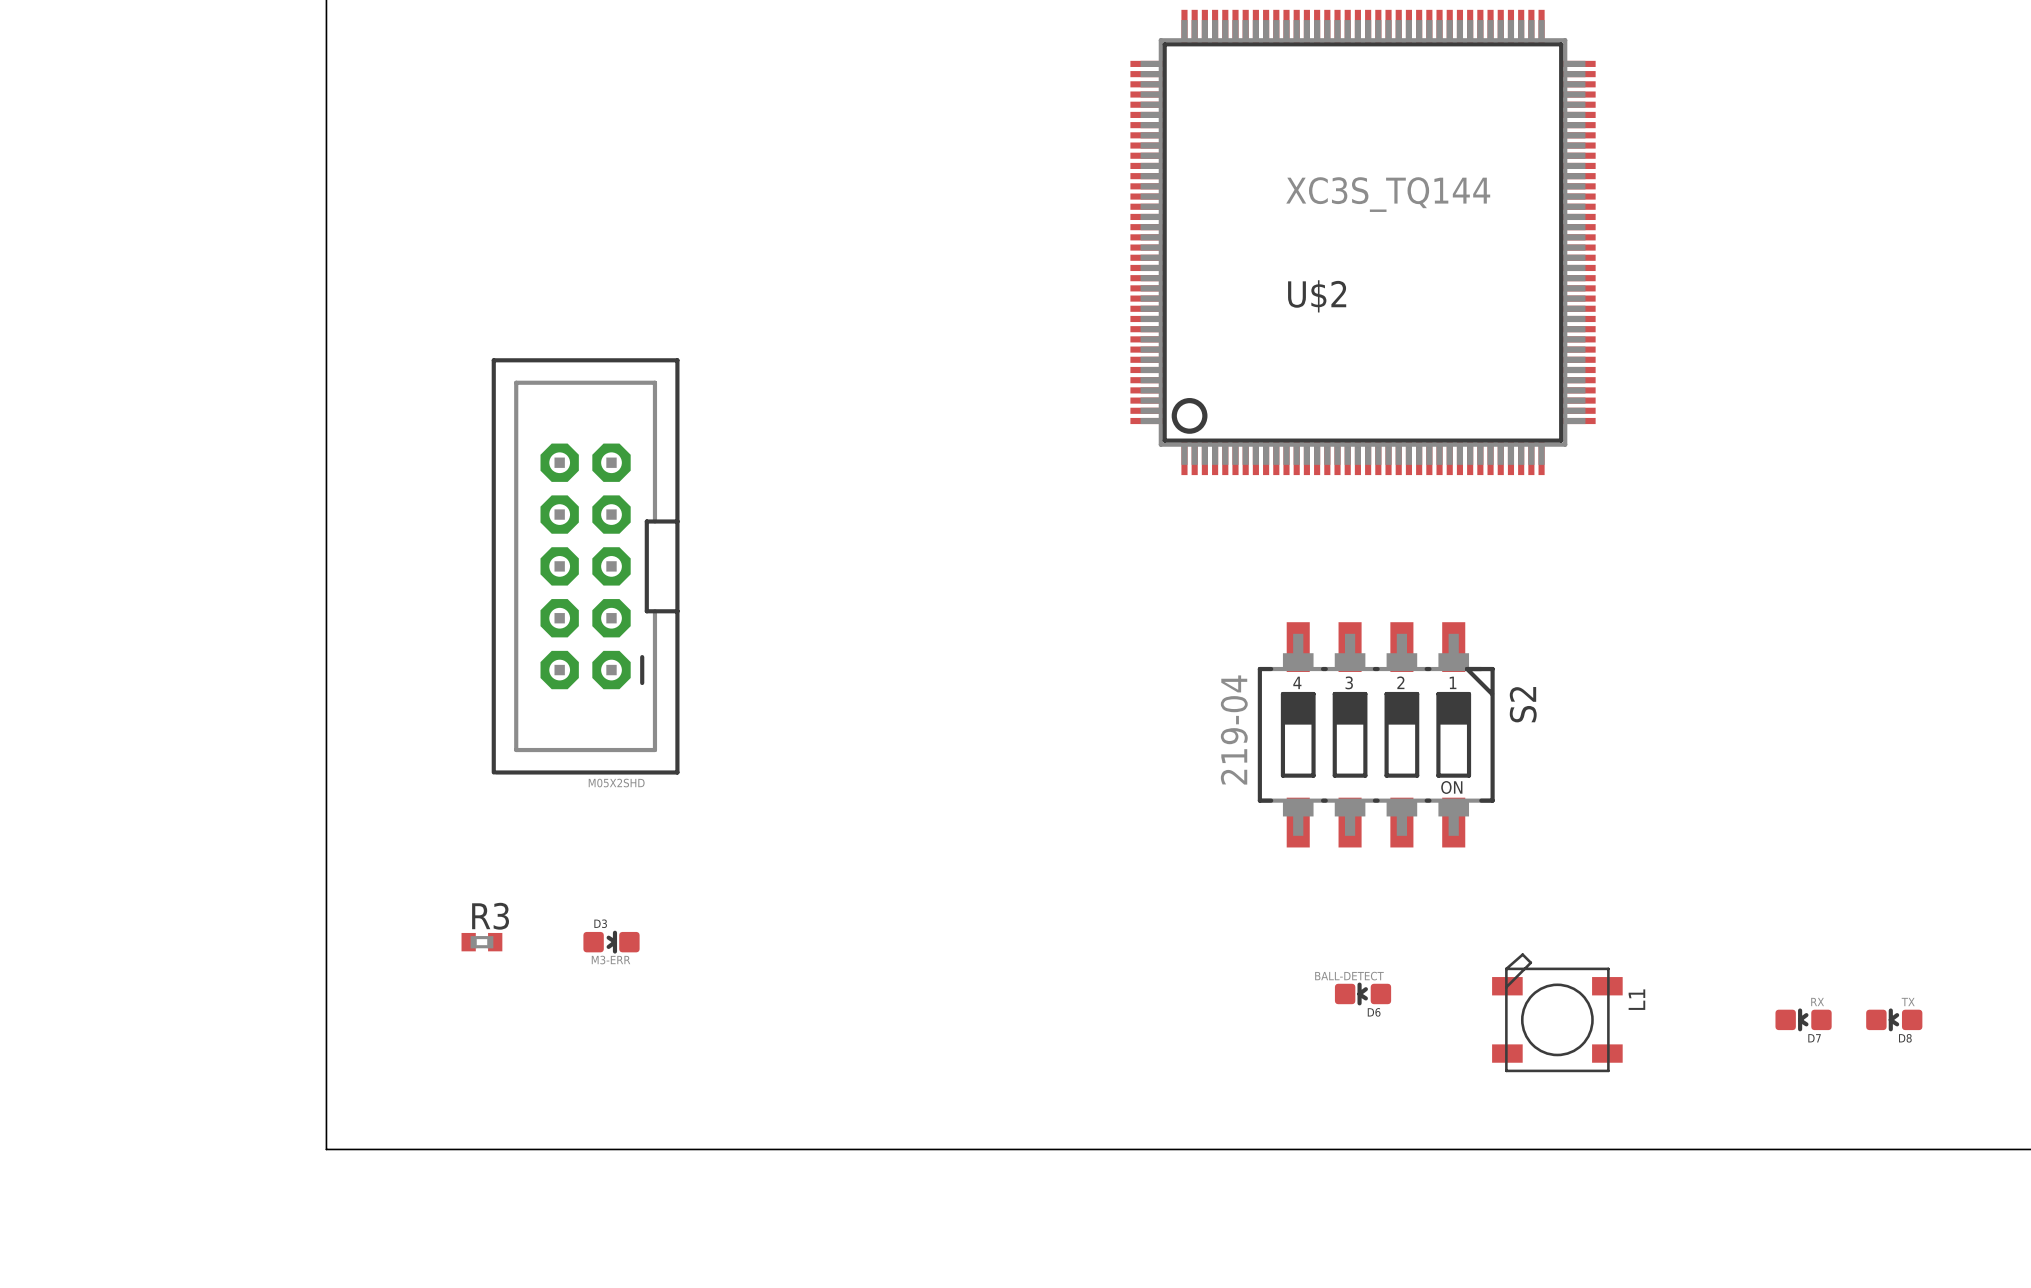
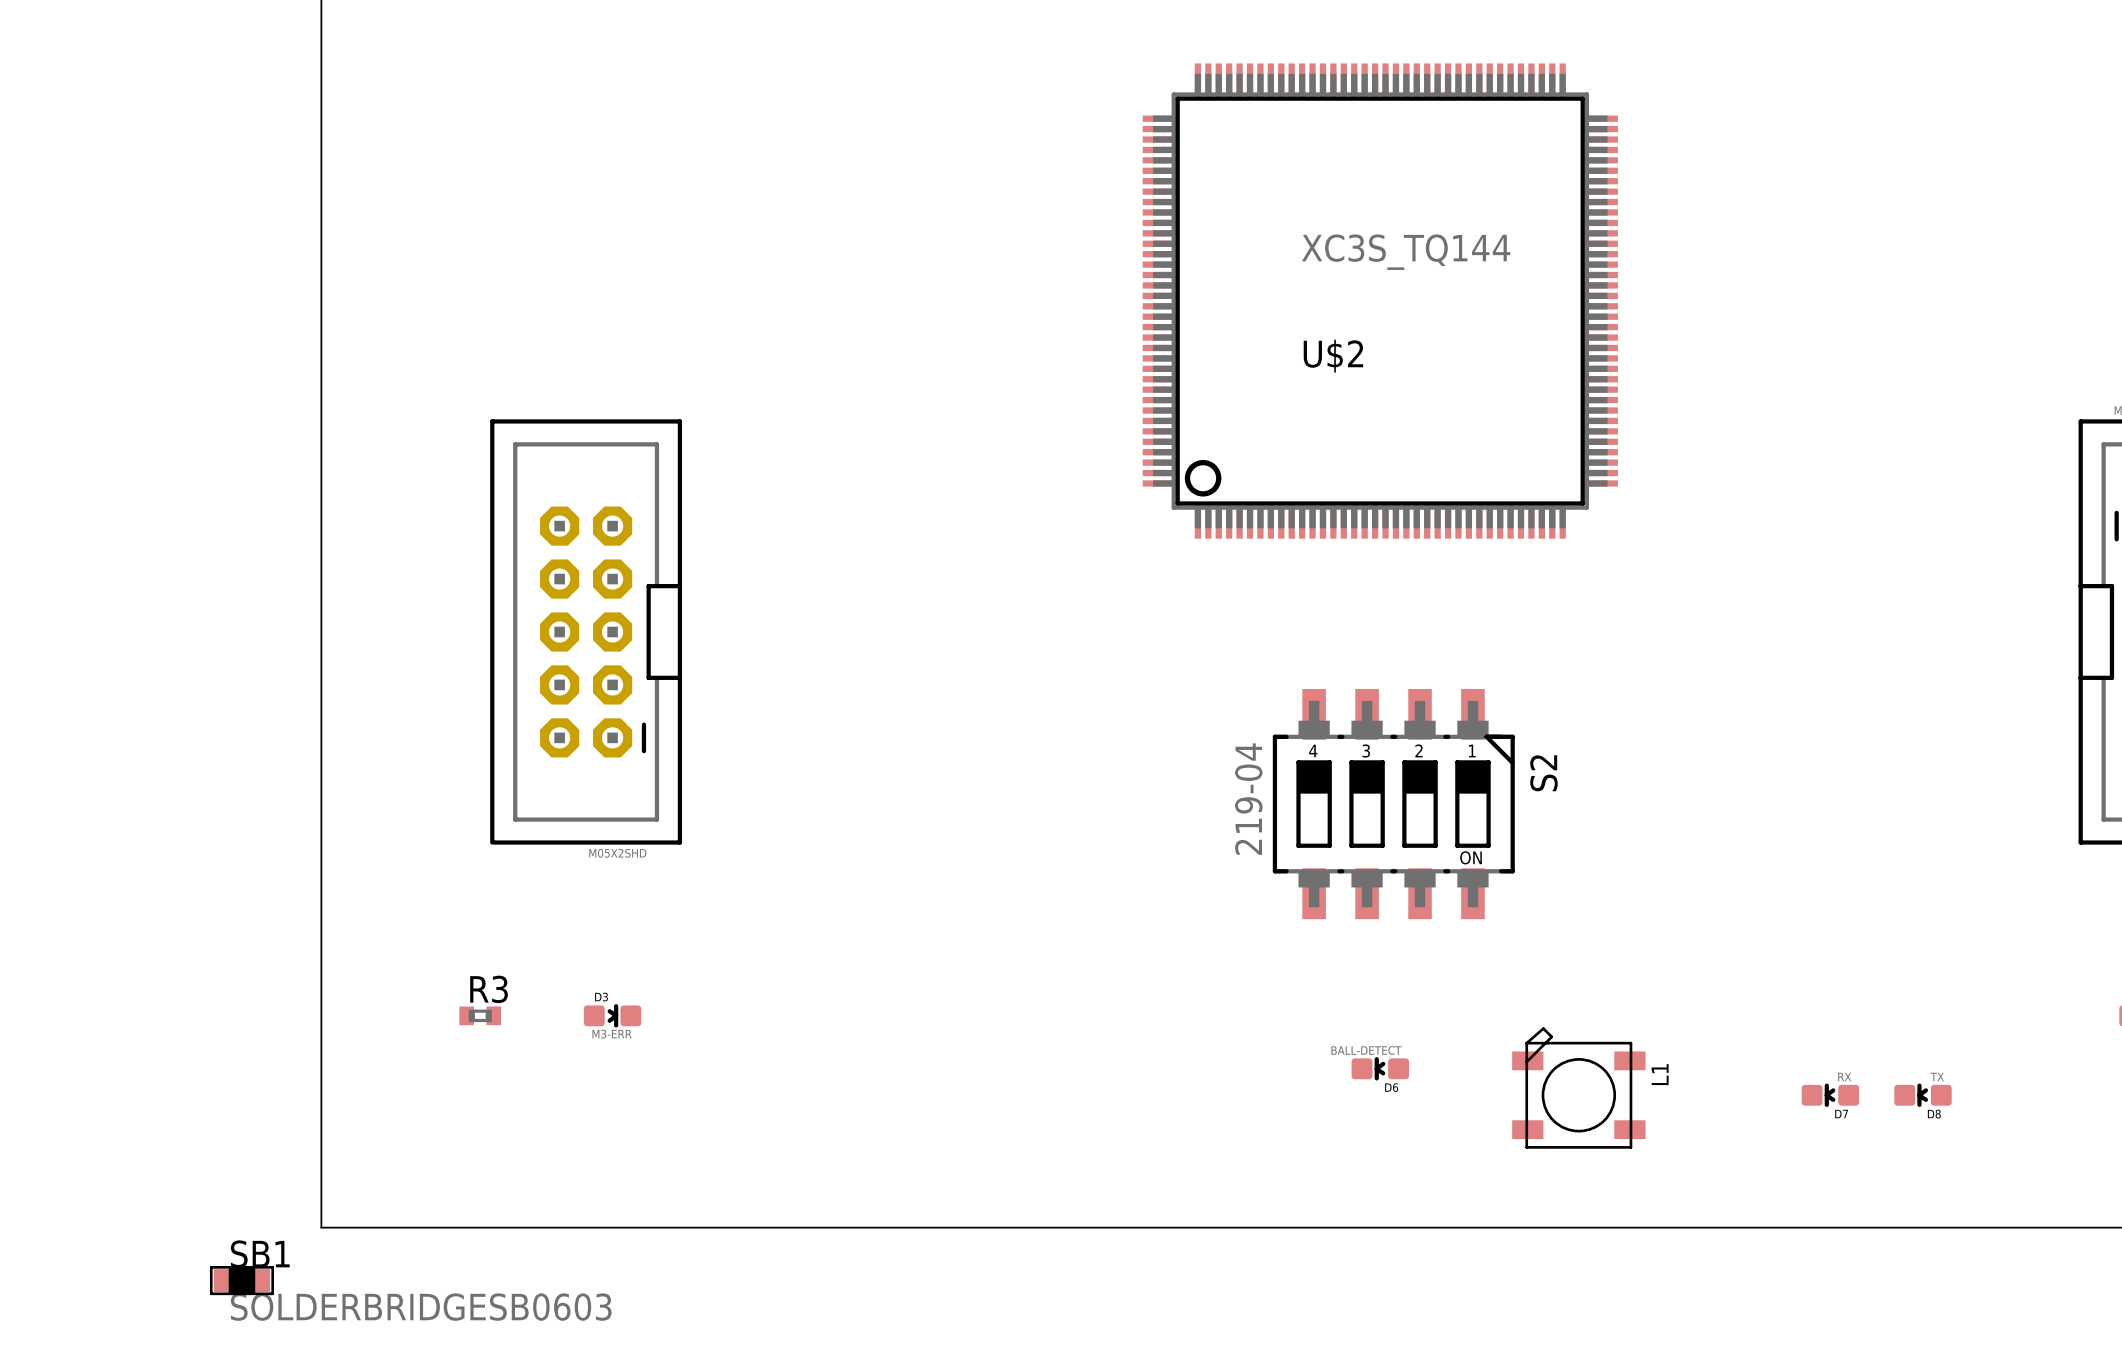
SB1: none -> SOLDERBRIDGESB0603 (241, 1280)

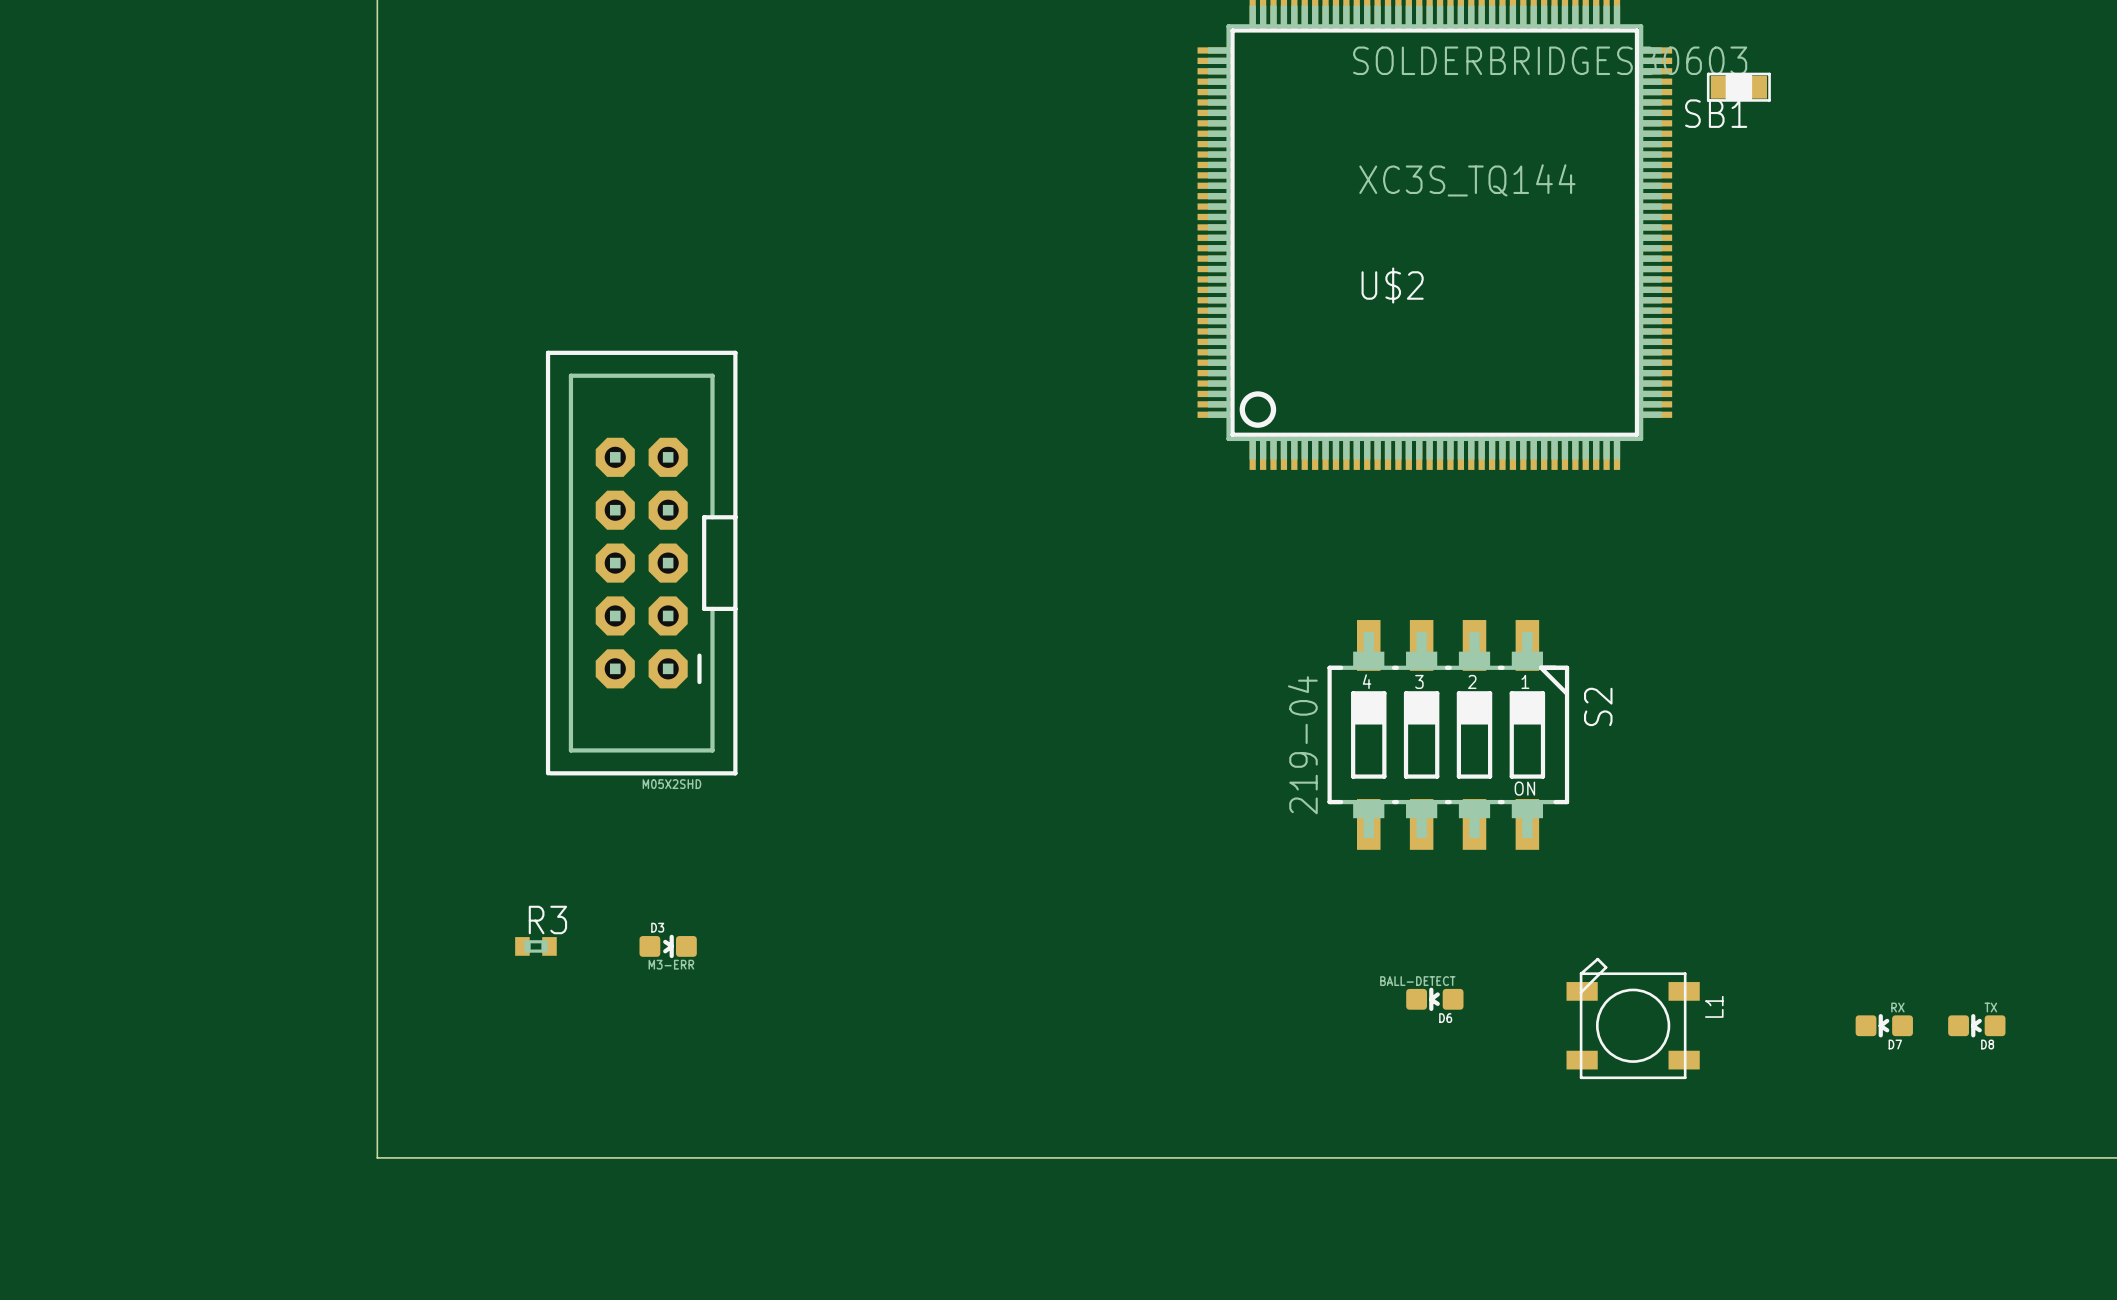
SB1 name position: SB1 (260, 1254) -> SB1 (1716, 113)
SB1 position: (241, 1280) -> (1738, 87)
SB1 value position: SOLDERBRIDGESB0603 (421, 1307) -> SOLDERBRIDGESB0603 (1550, 60)

